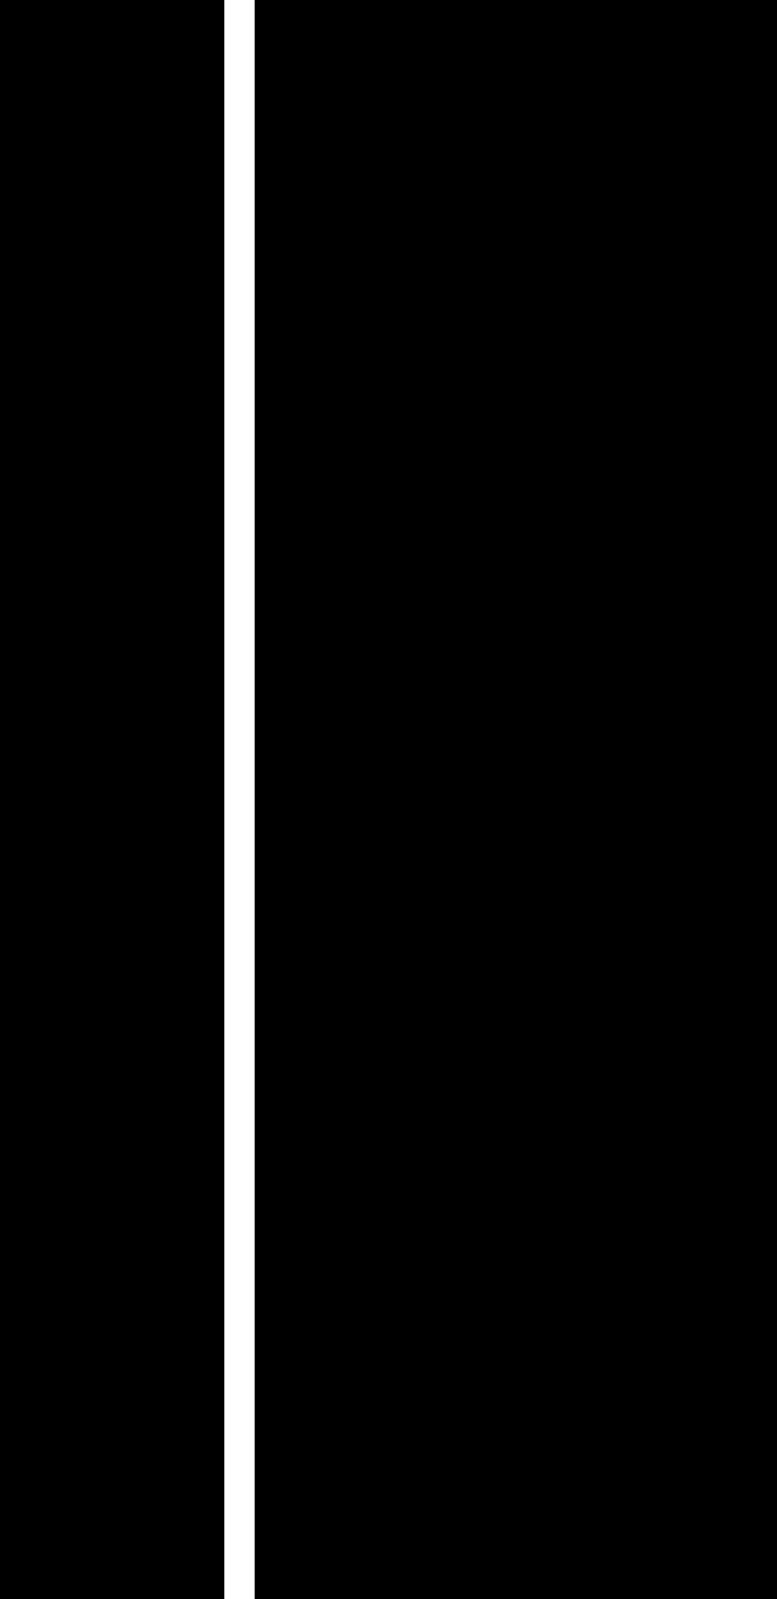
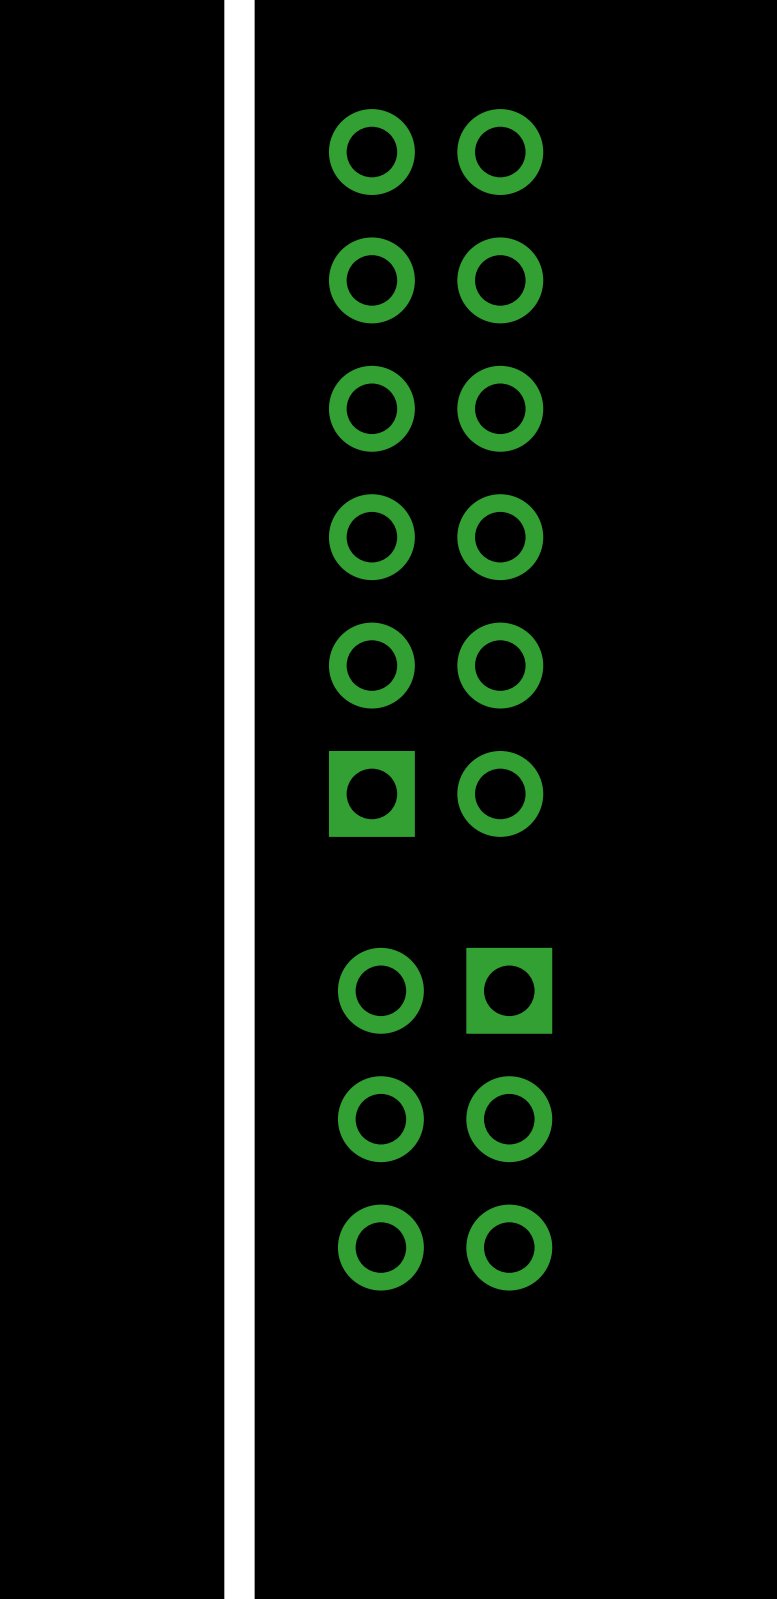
part: none -> (436, 472)
part: none -> (445, 1119)

